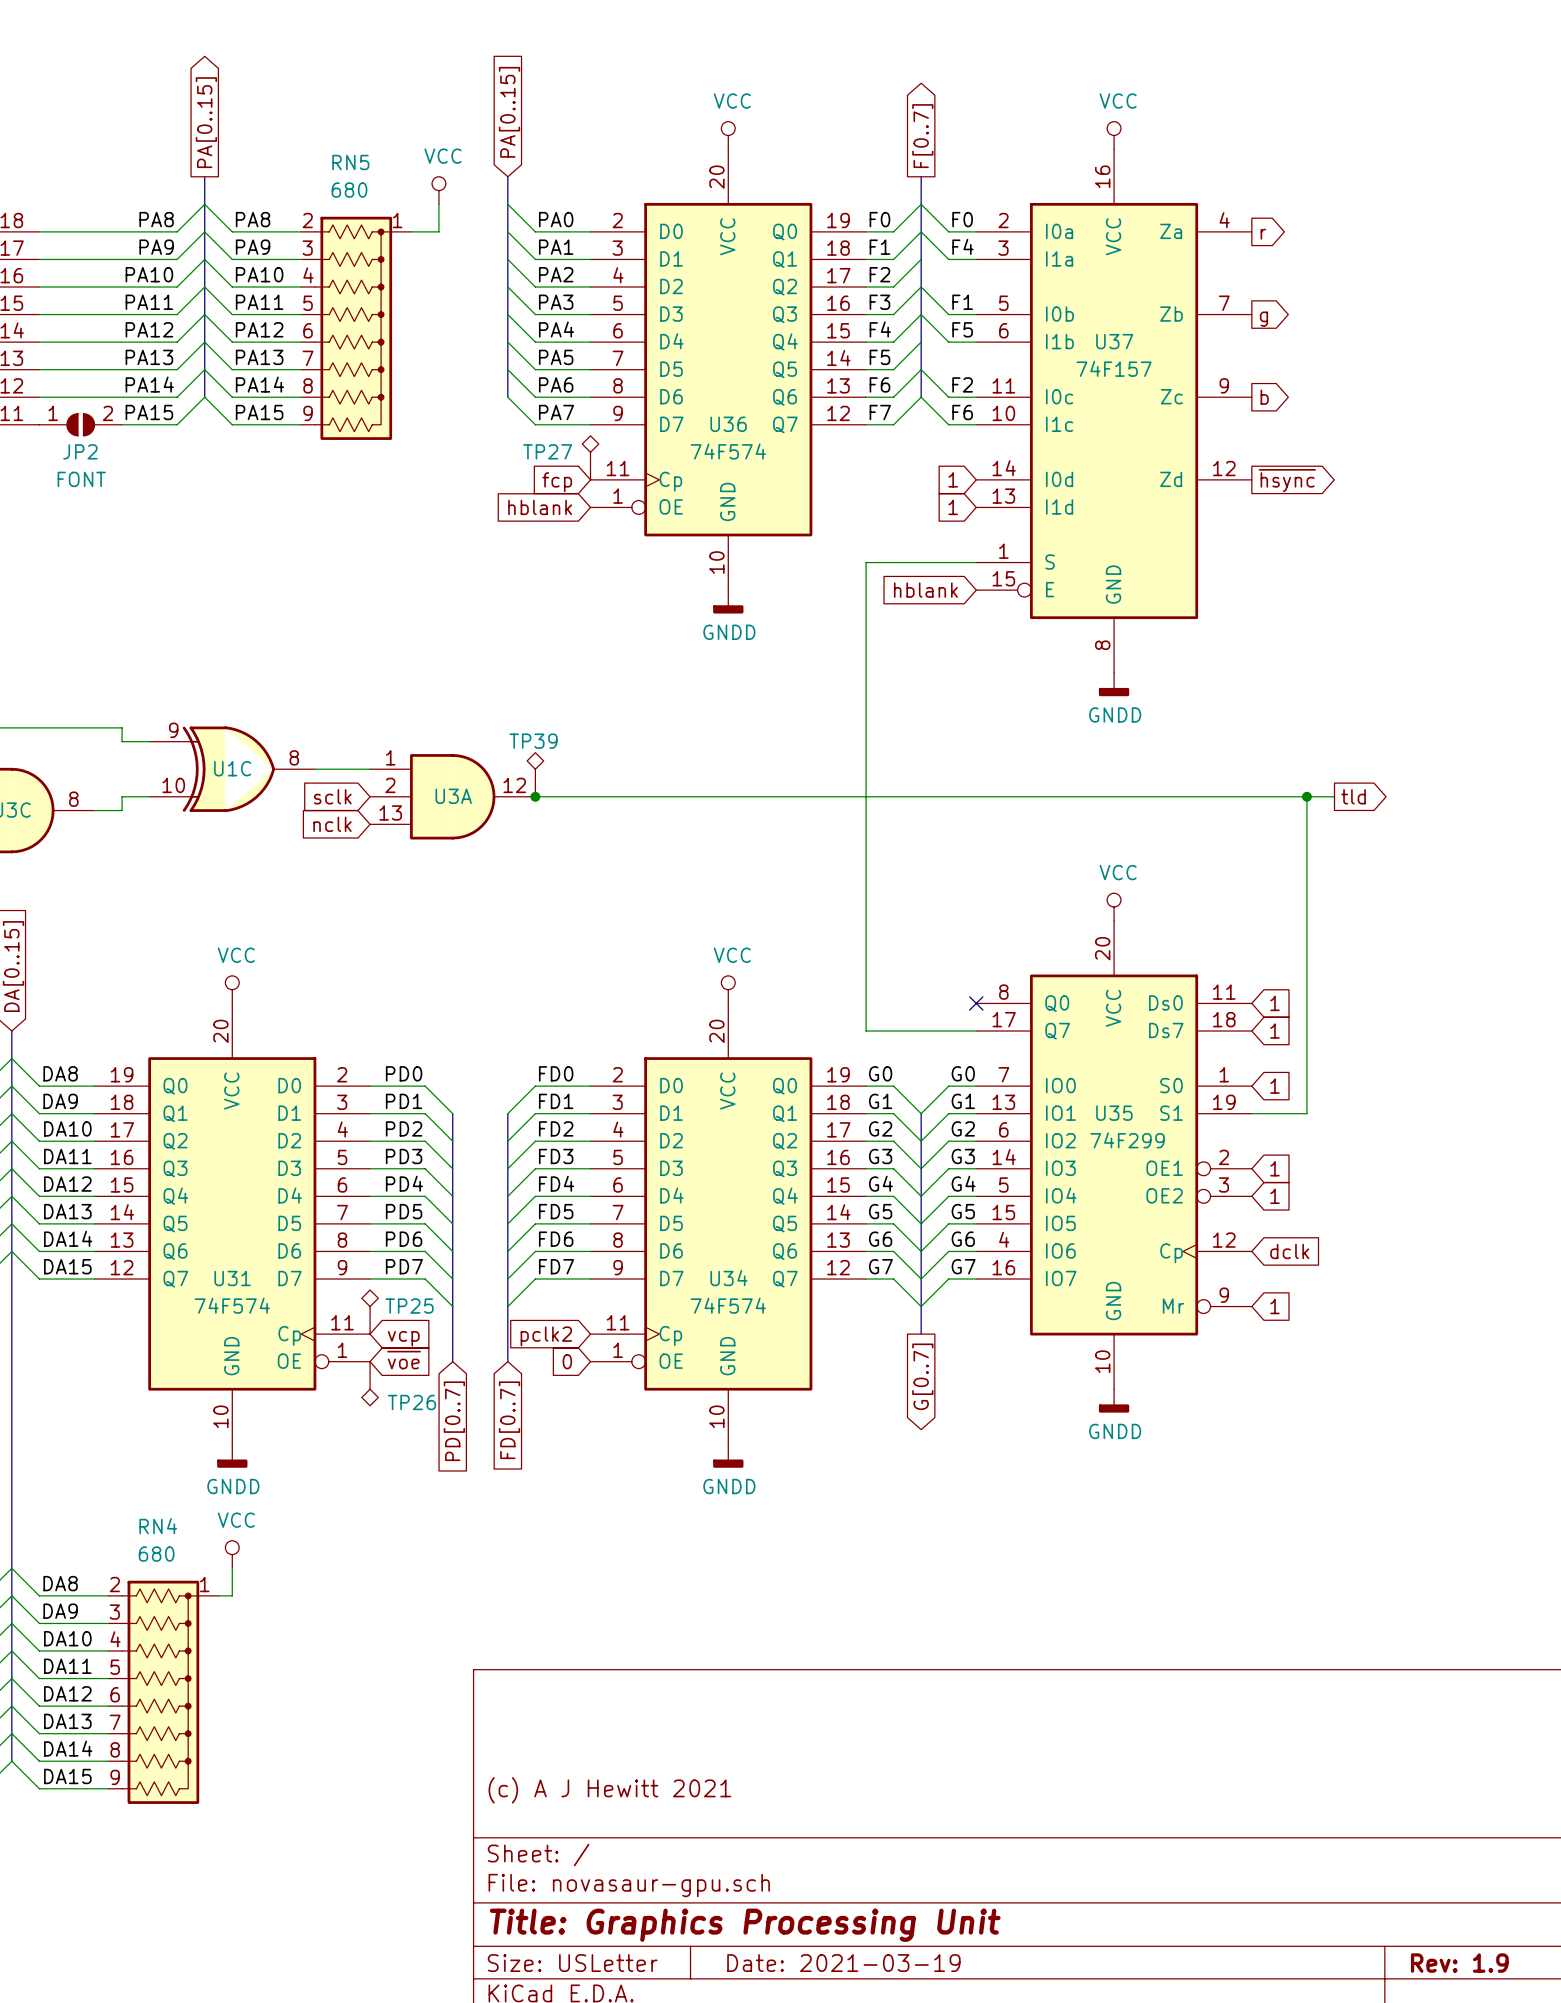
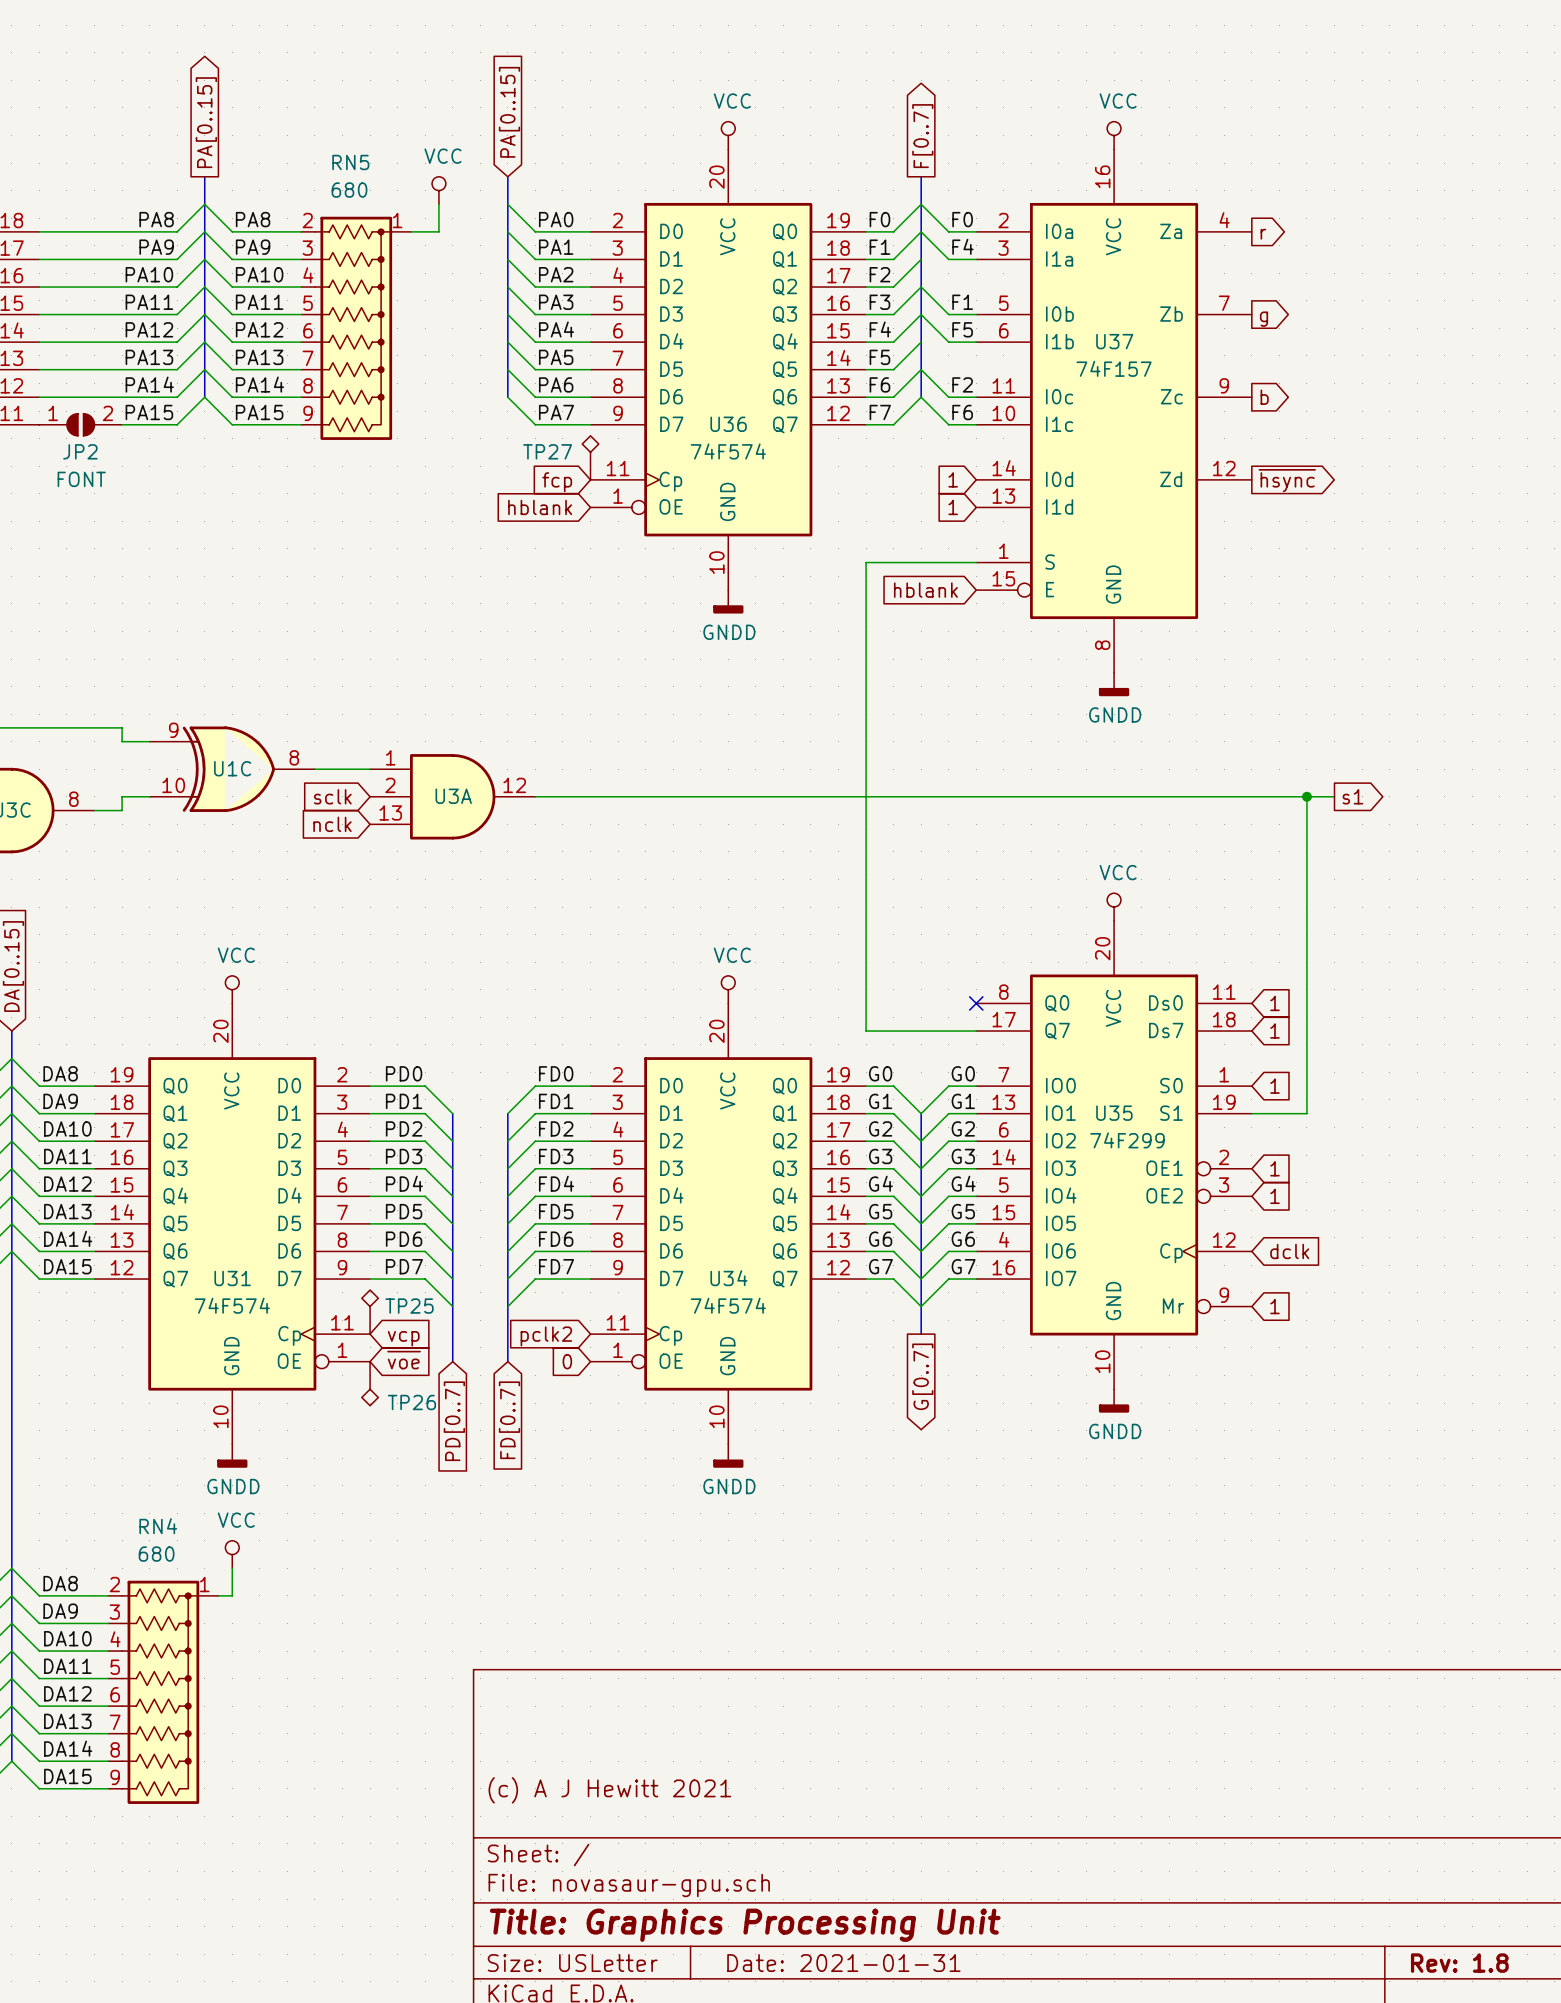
TP39: (535, 774) -> none
junction: (535, 796) -> none
global label: tld (1353, 796) -> s1 (1352, 796)
title block: Date: 2021-03-19 (843, 1963) -> Date: 2021-01-31 (843, 1963)
title block: Rev: 1.9 (1459, 1963) -> Rev: 1.8 (1459, 1963)

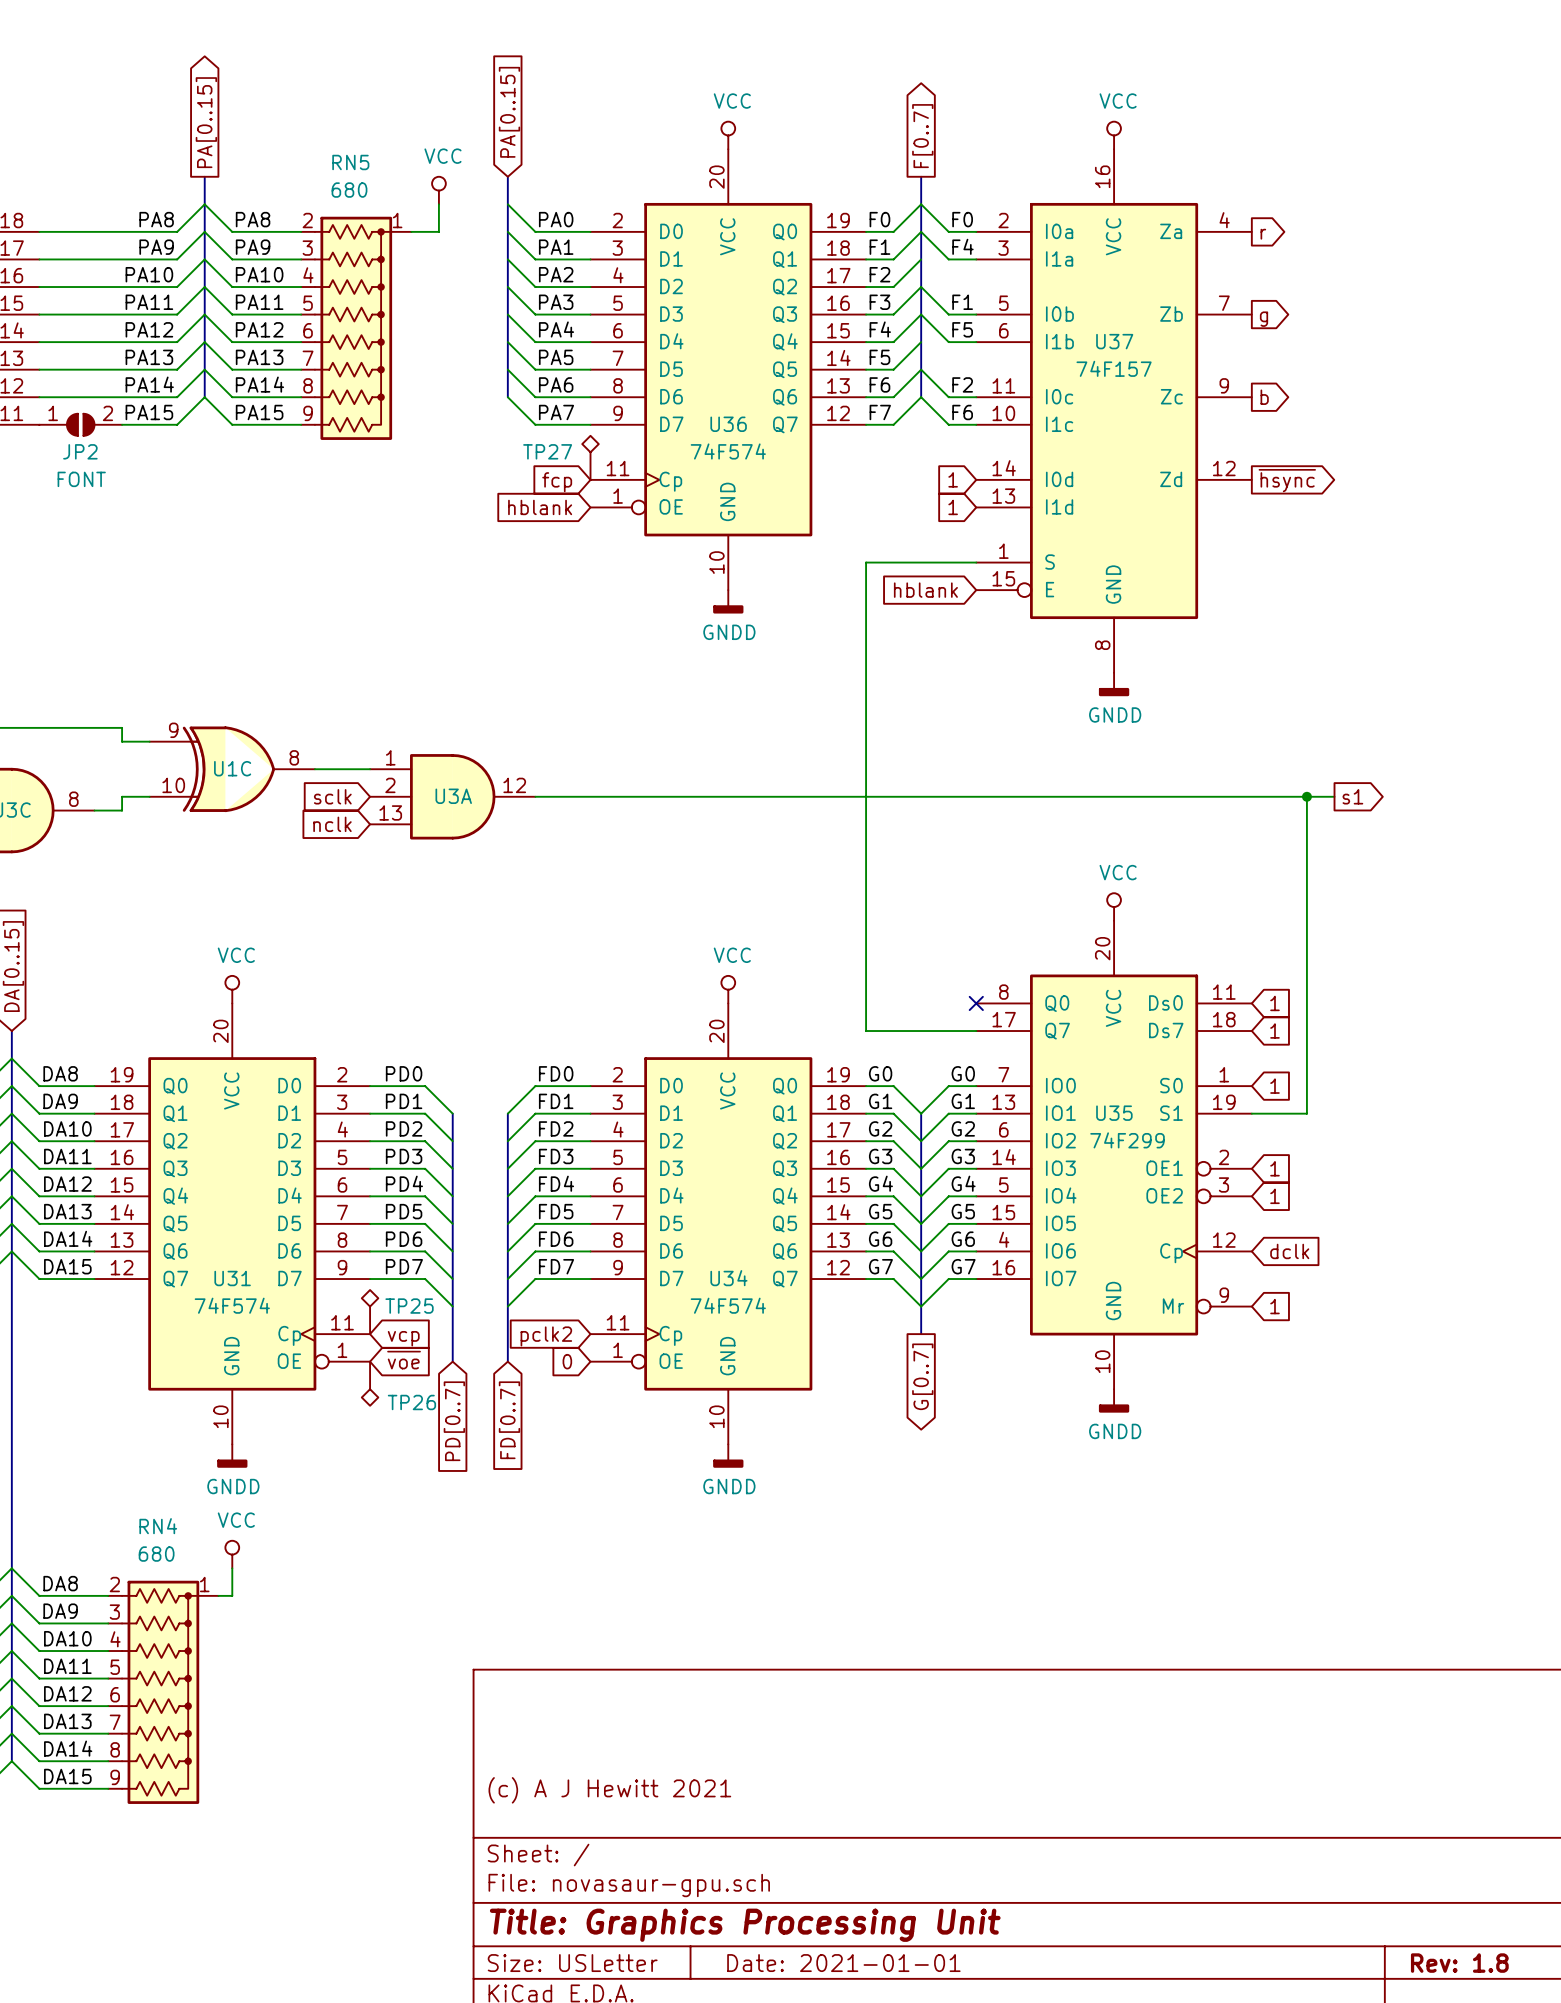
title block: Date: 2021-01-31 (843, 1963) -> Date: 2021-01-01 (843, 1963)

